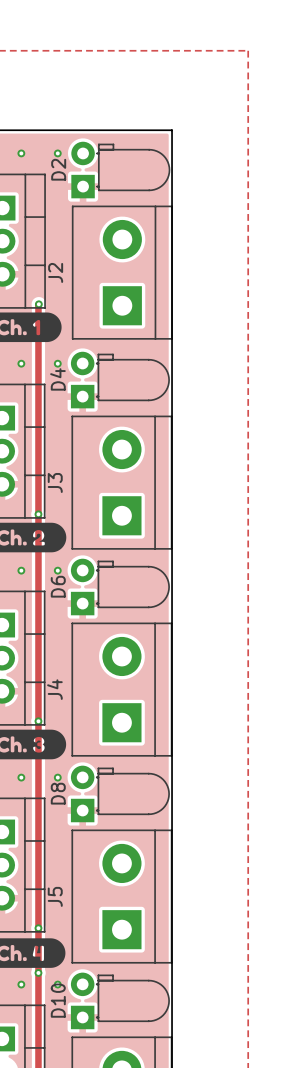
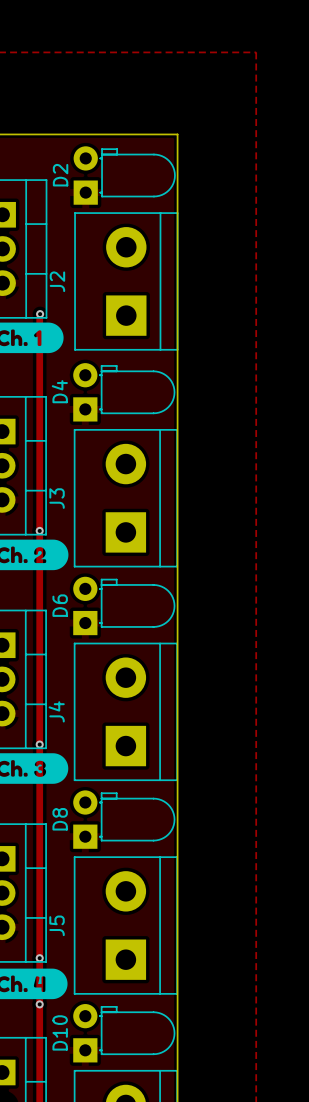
via: (21, 153) -> none
via: (57, 153) -> none
via: (21, 363) -> none
via: (57, 363) -> none
via: (21, 570) -> none
via: (57, 570) -> none
via: (21, 777) -> none
via: (57, 777) -> none
via: (21, 984) -> none
via: (57, 984) -> none

